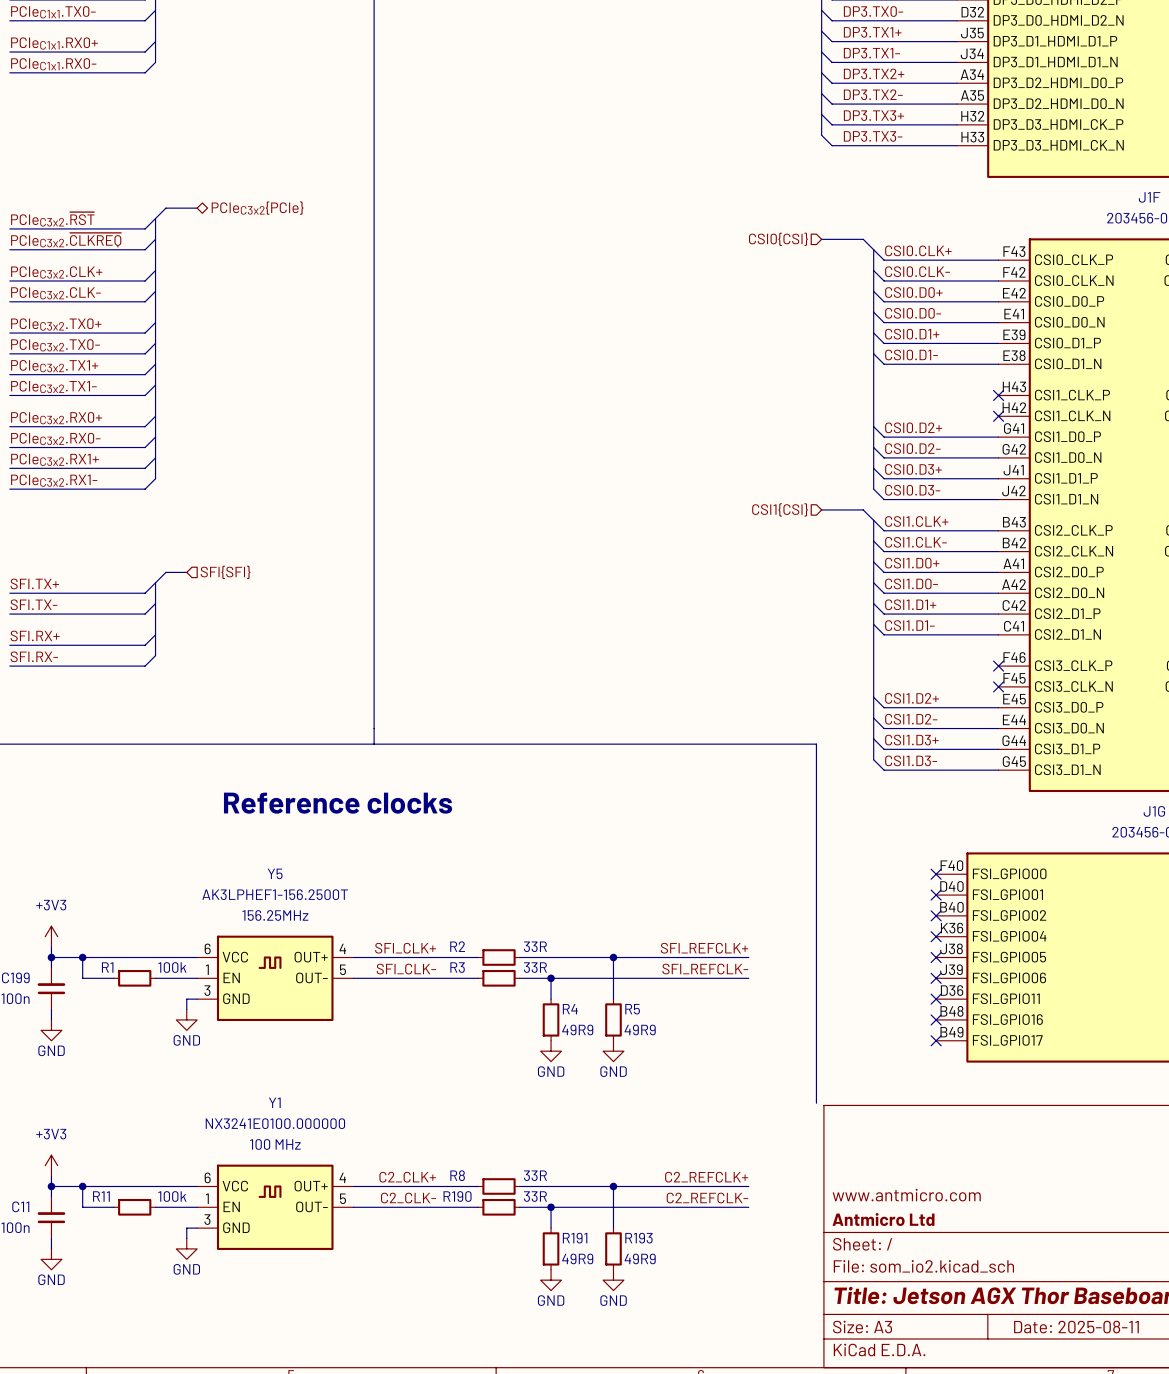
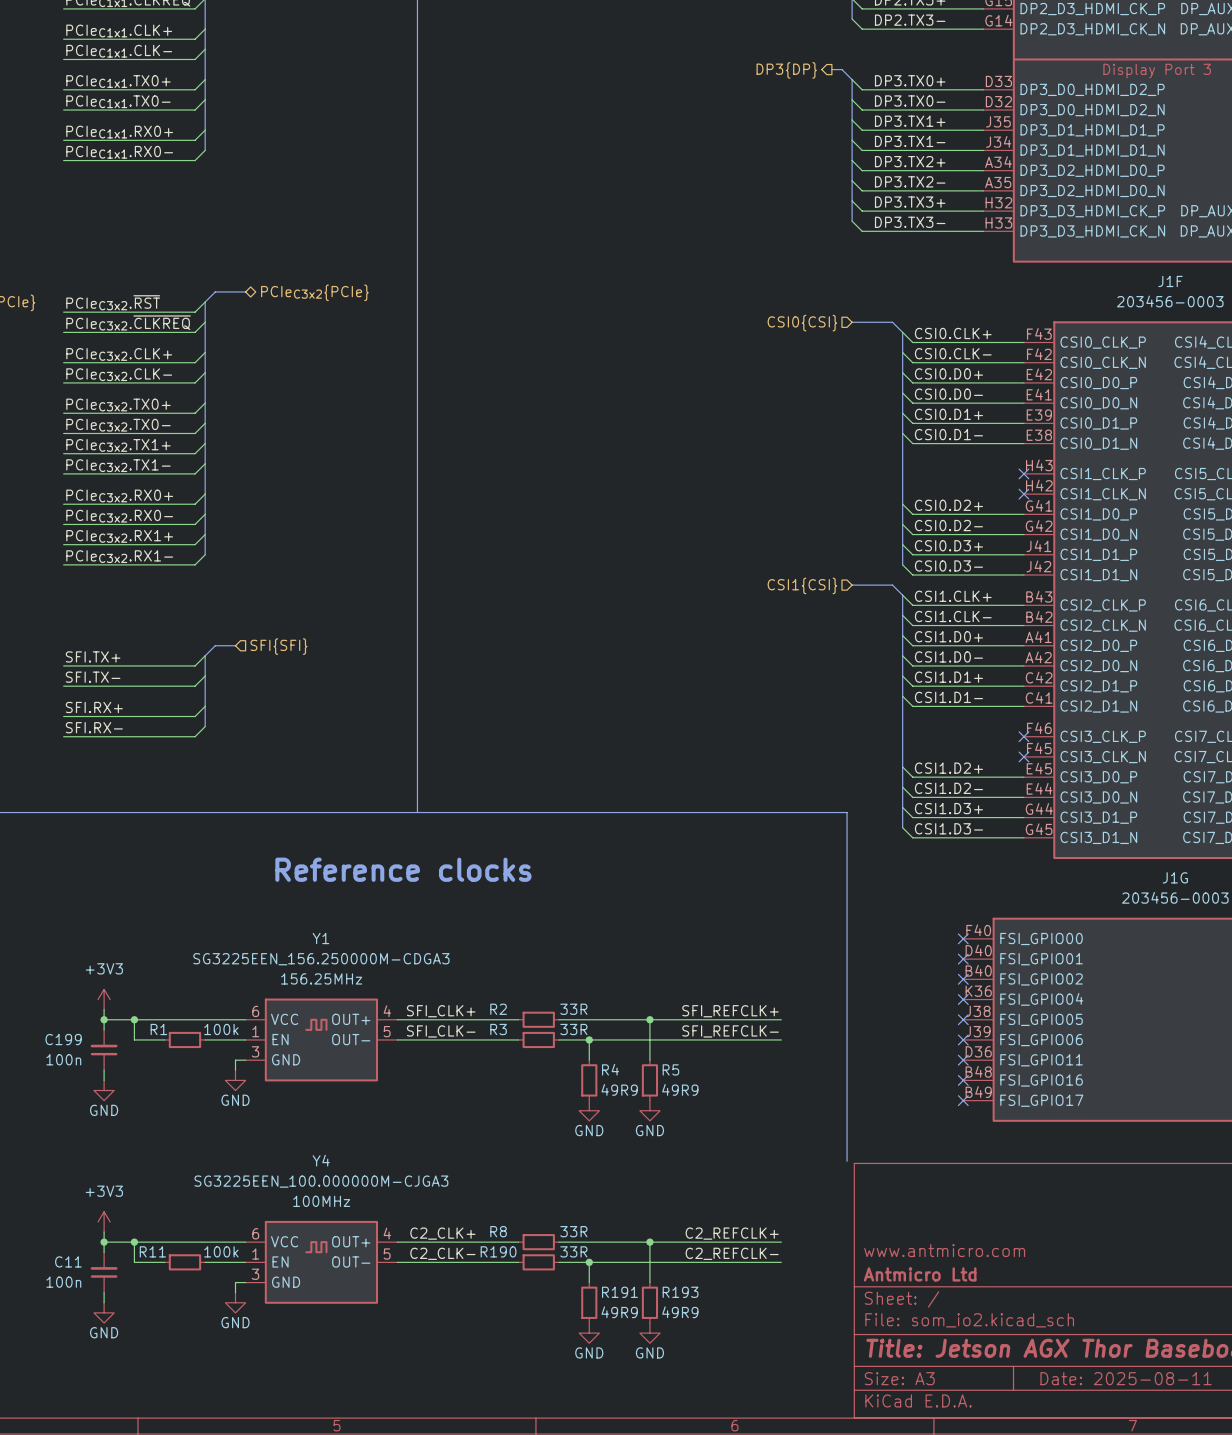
Y5 name: Y5 (275, 873) -> Y1 (320, 938)
Y5 text: AK3LPHEF1-156.2500T (275, 894) -> SG3225EEN_156.250000M-CDGA3 (321, 959)
Y1 name: Y1 (274, 1102) -> Y4 (321, 1160)
Y1 text: NX3241E0100.000000 (275, 1123) -> SG3225EEN_100.000000M-CJGA3 (321, 1181)
Y1 text: 100 MHz (275, 1144) -> 100MHz (321, 1201)

